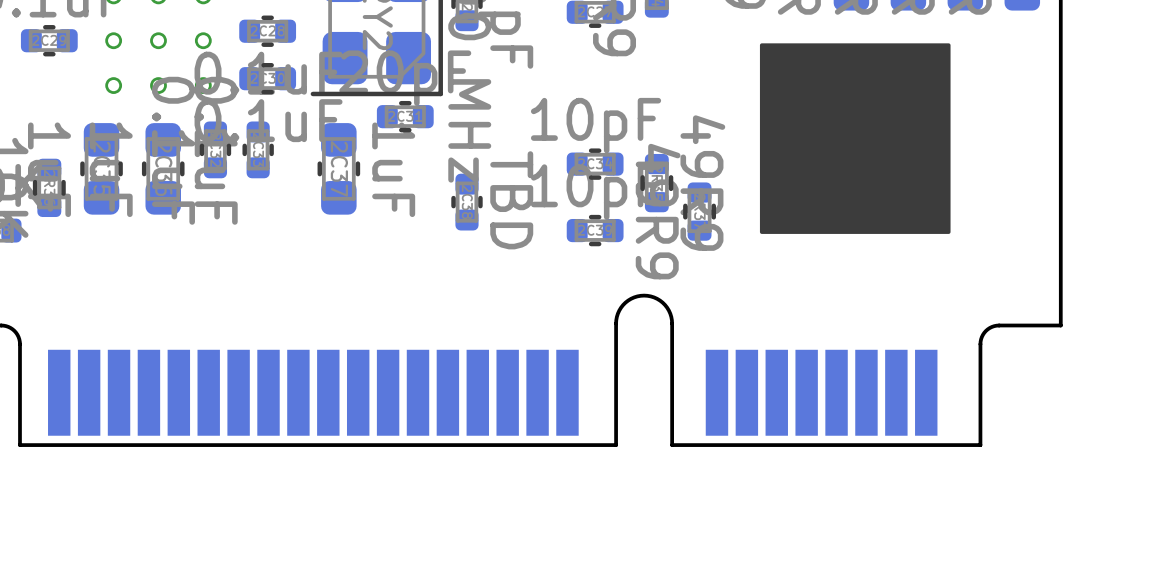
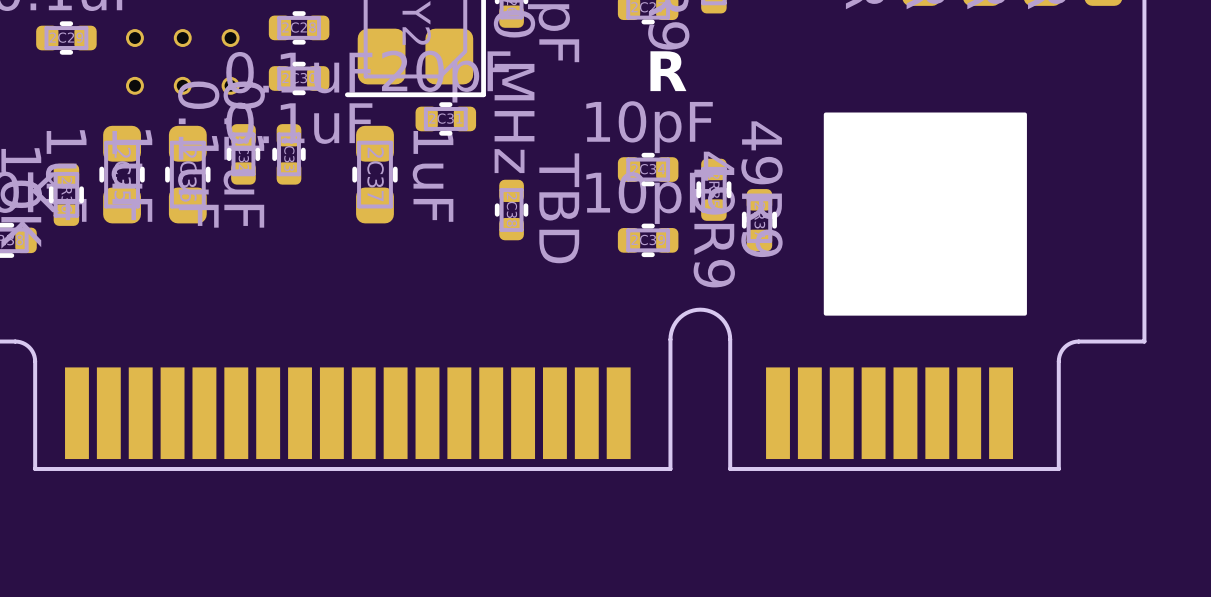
text: none -> R (668, 71)
drawing position: (855, 138) -> (925, 214)

